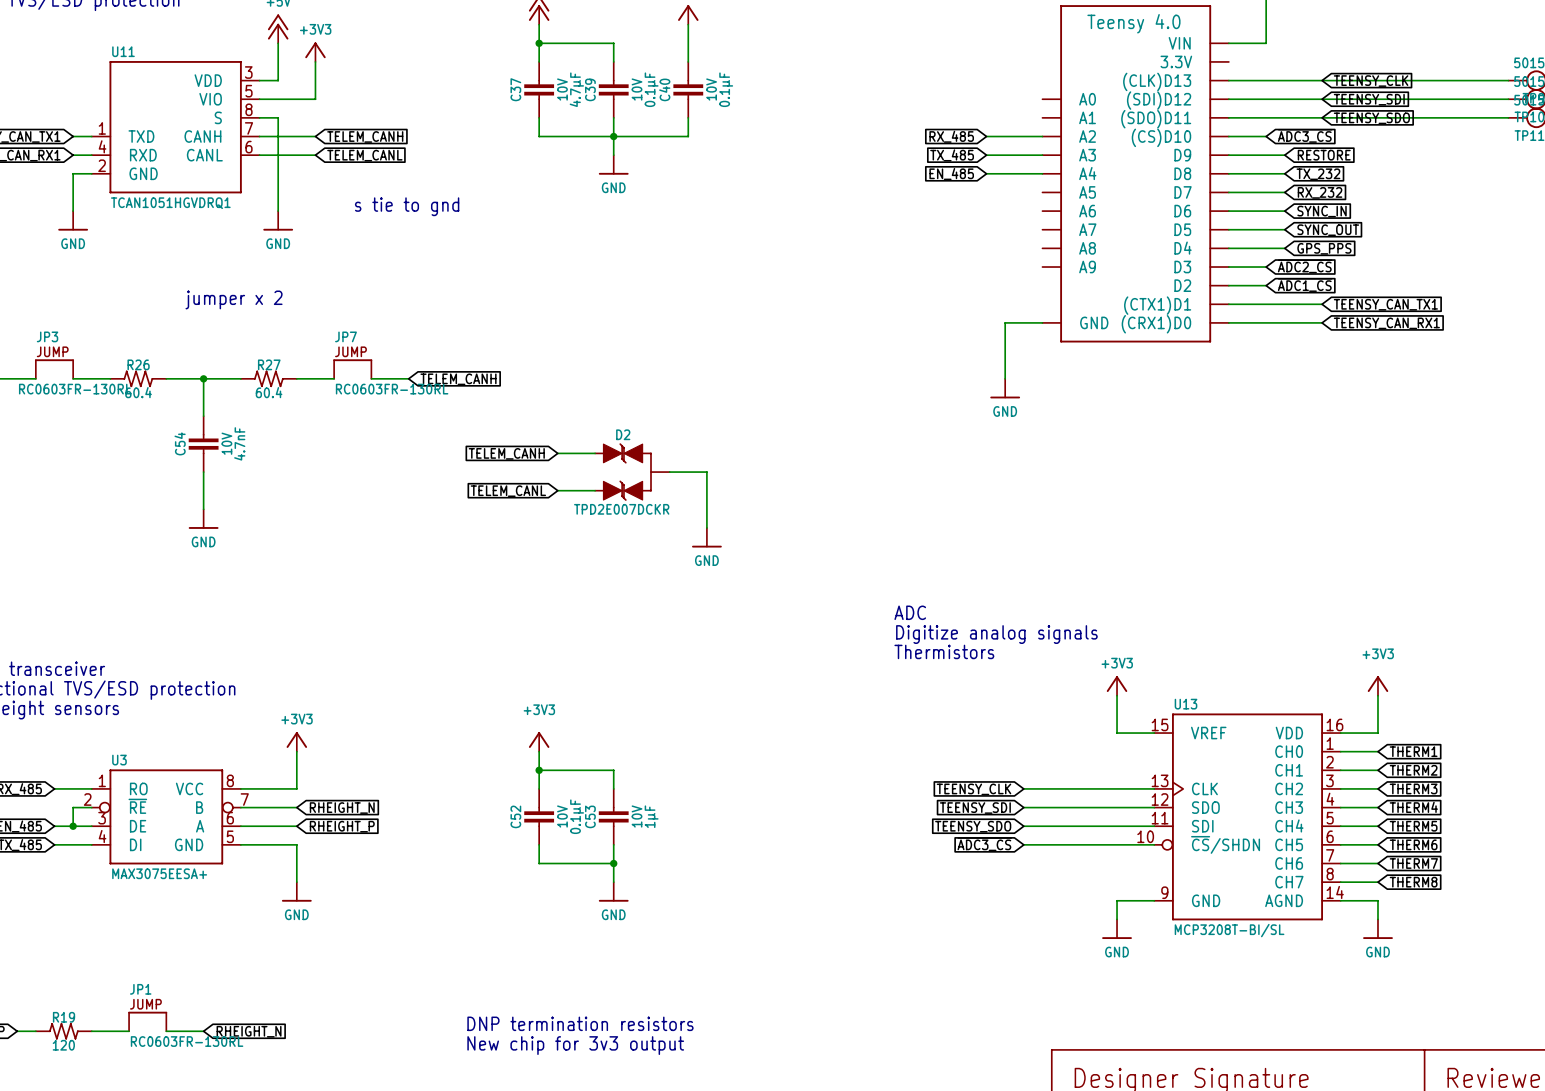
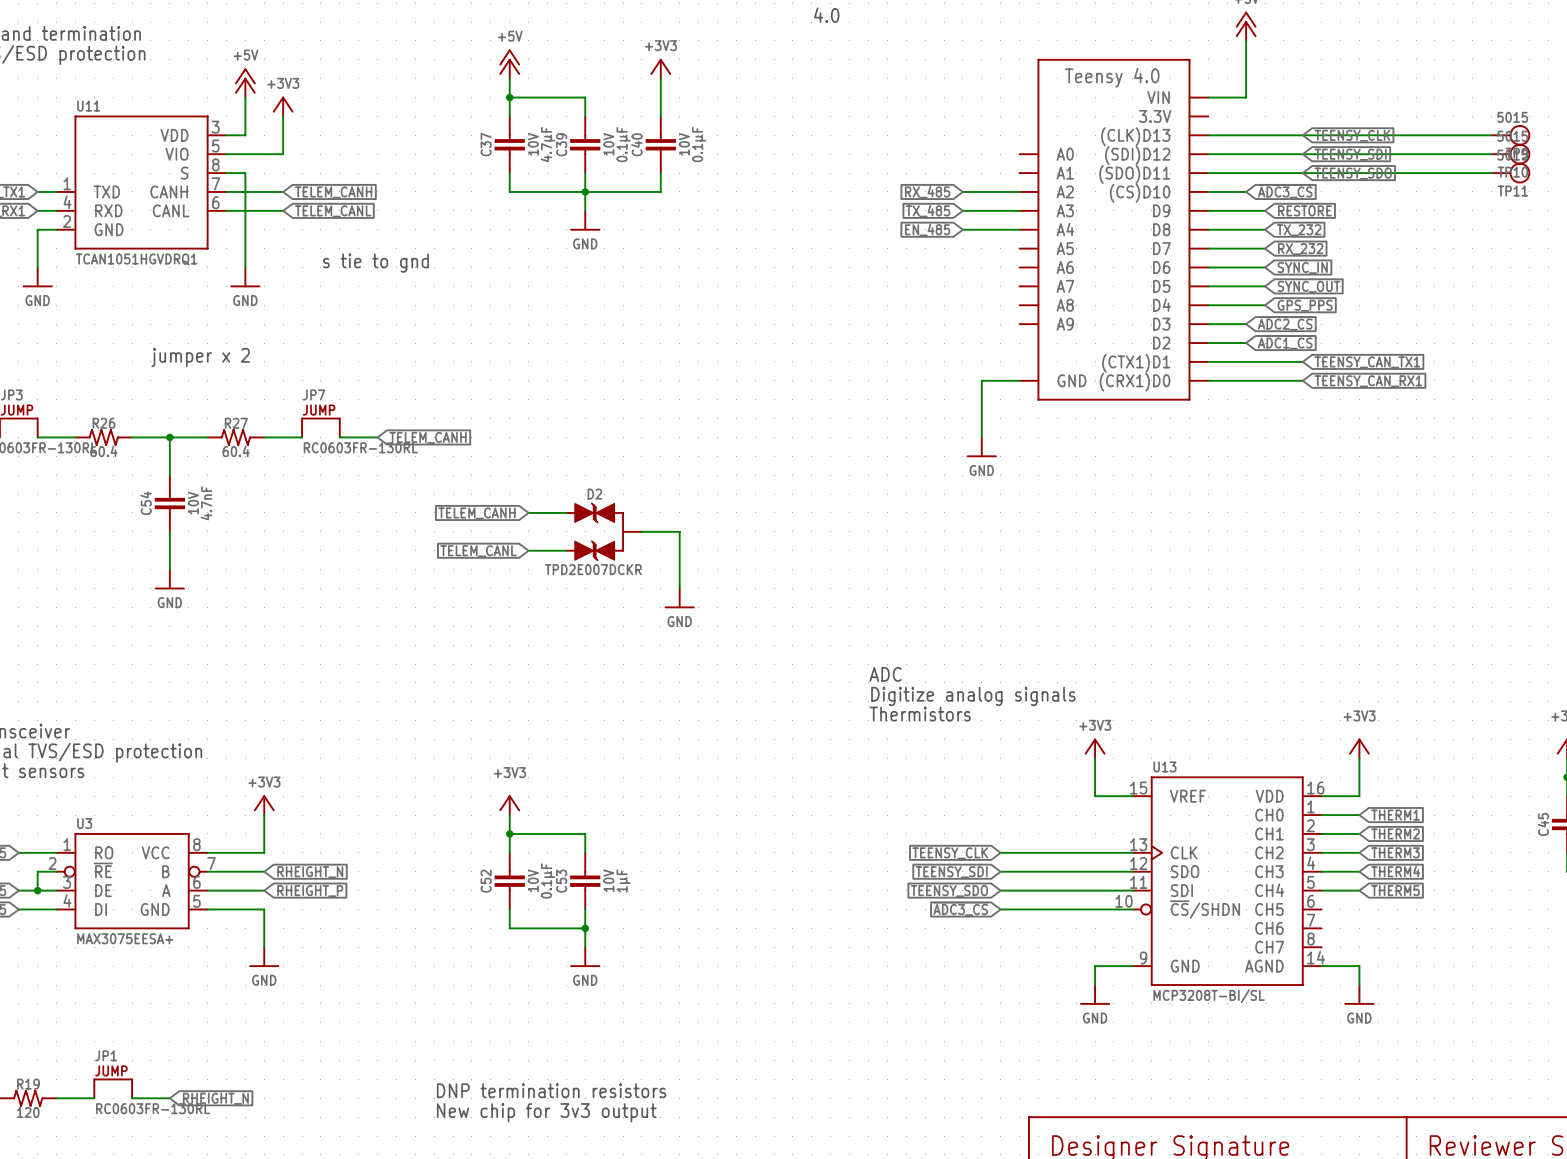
wire: (1340, 844) (1377, 844) -> none
global label: THERM6 (1413, 844) -> none
wire: (1340, 863) (1377, 863) -> none
global label: THERM7 (1413, 863) -> none
wire: (1340, 882) (1377, 882) -> none
global label: THERM8 (1413, 882) -> none

